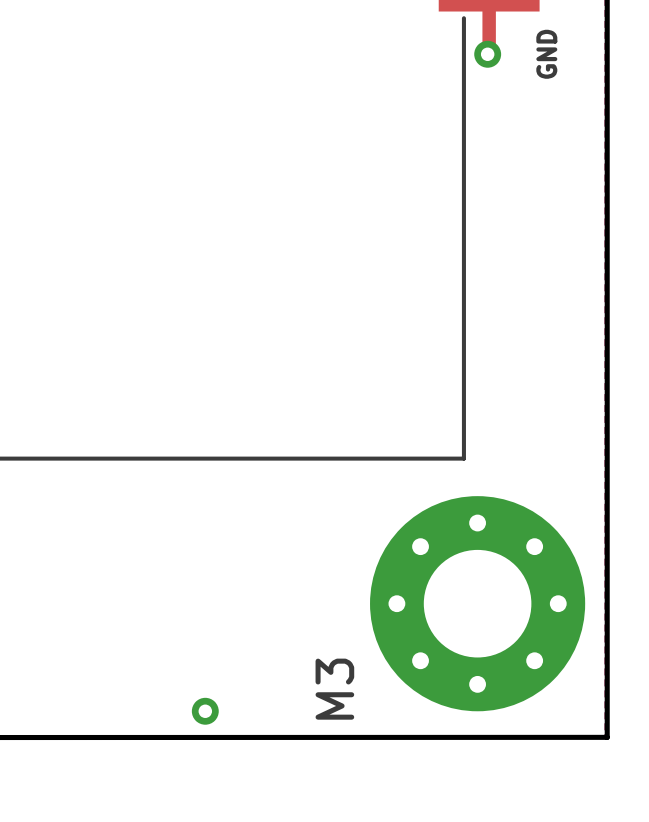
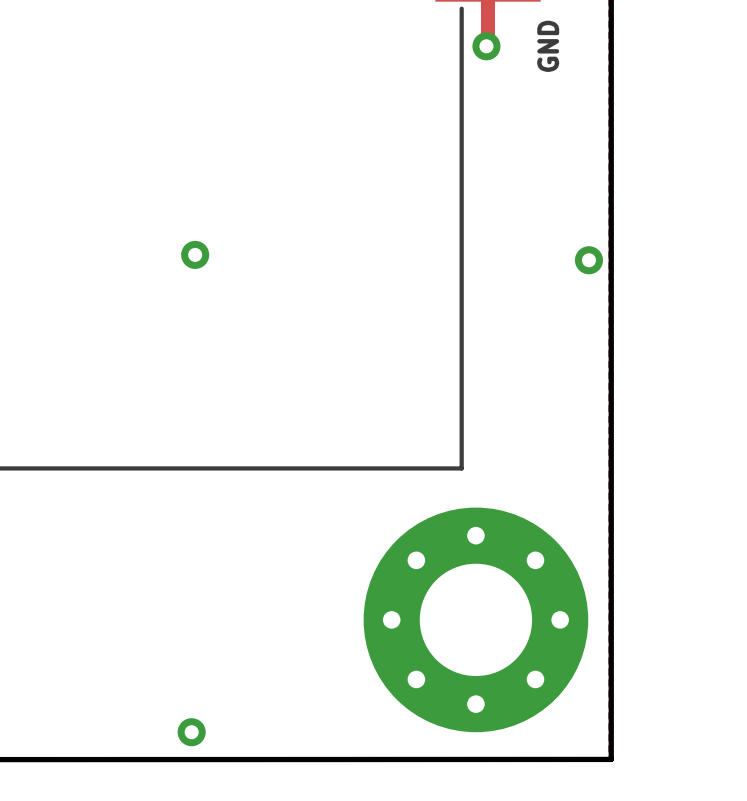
via: none -> (195, 254)
via: none -> (588, 260)
text: M3 (334, 689) -> none

